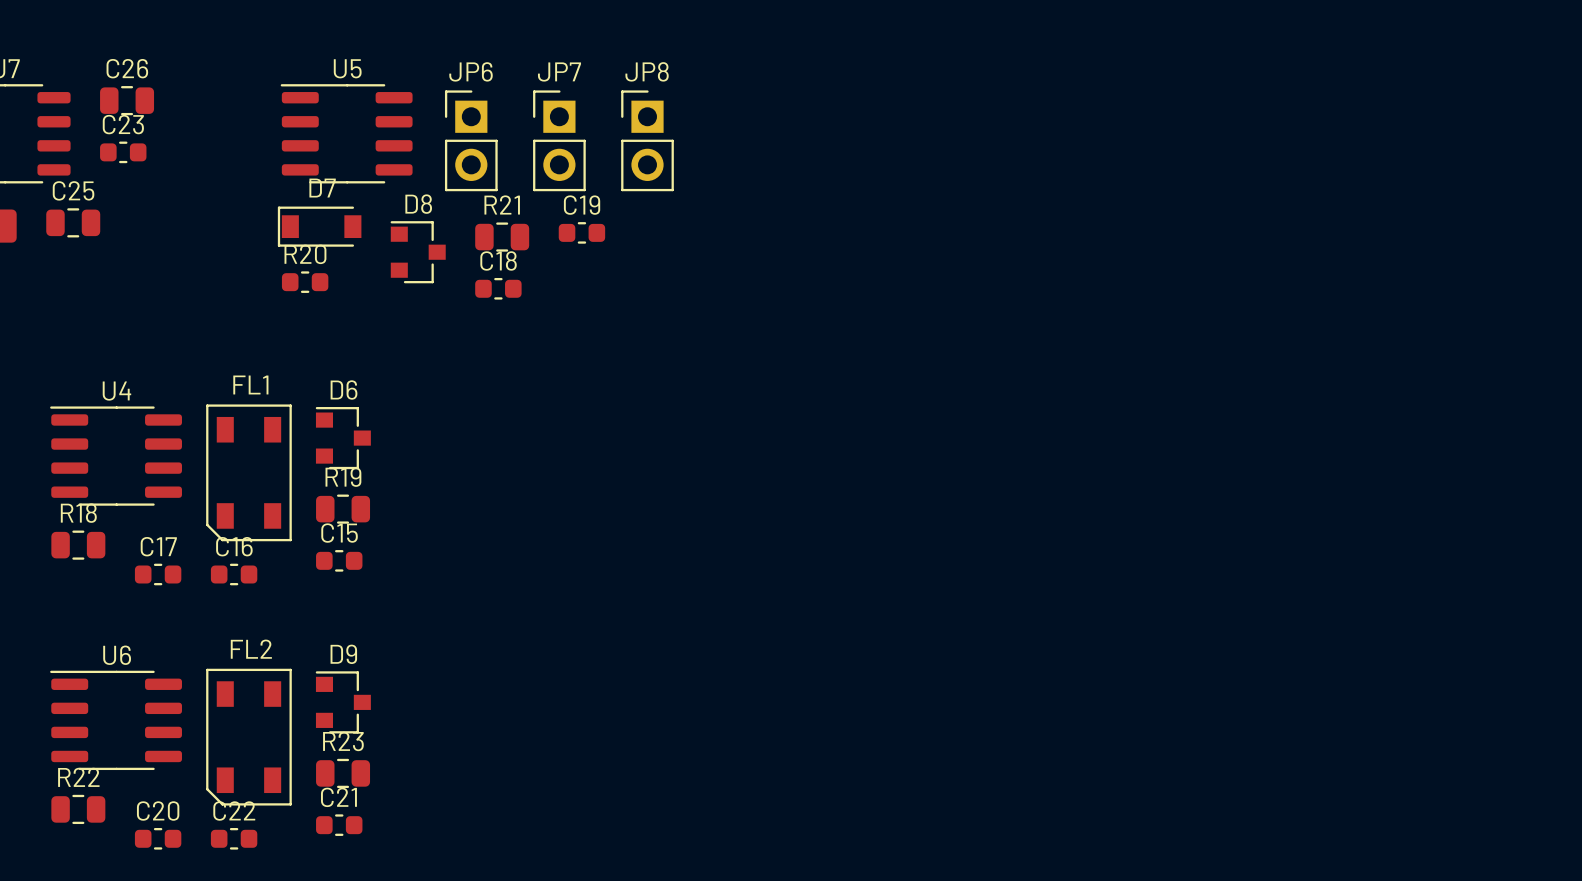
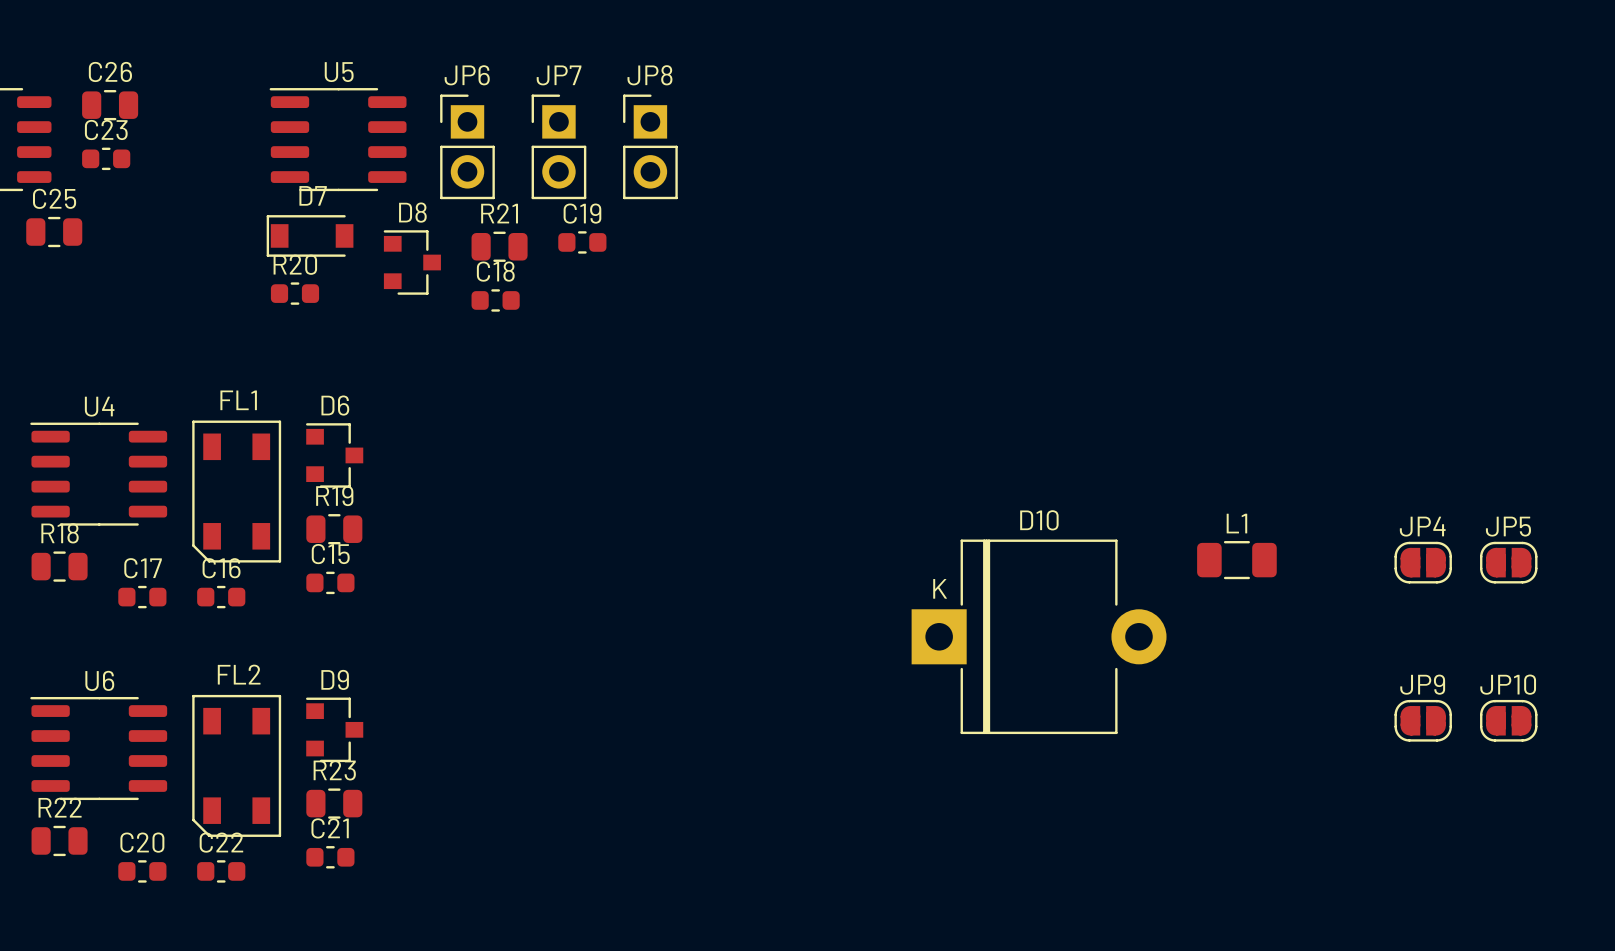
L1: none -> (1236, 560)
JP4: none -> (1423, 562)
JP5: none -> (1508, 562)
D10: none -> (1039, 636)
JP9: none -> (1423, 720)
JP10: none -> (1508, 720)

